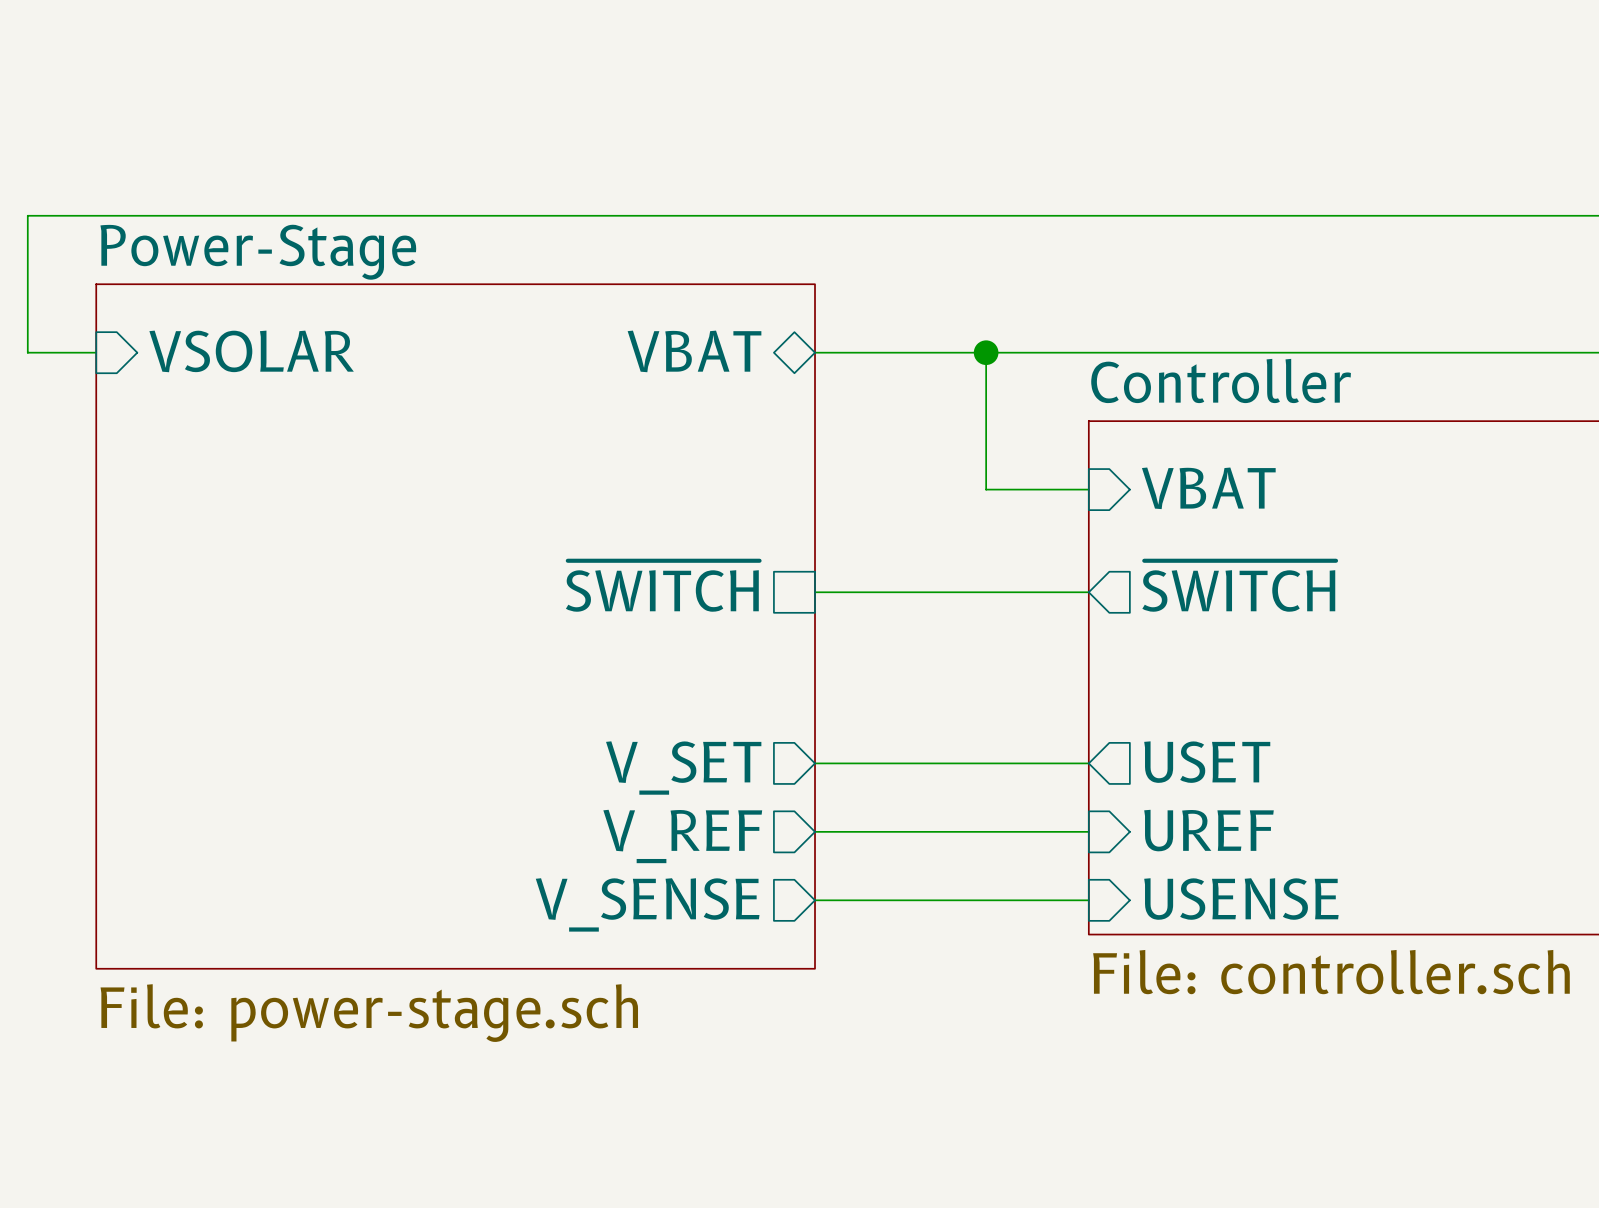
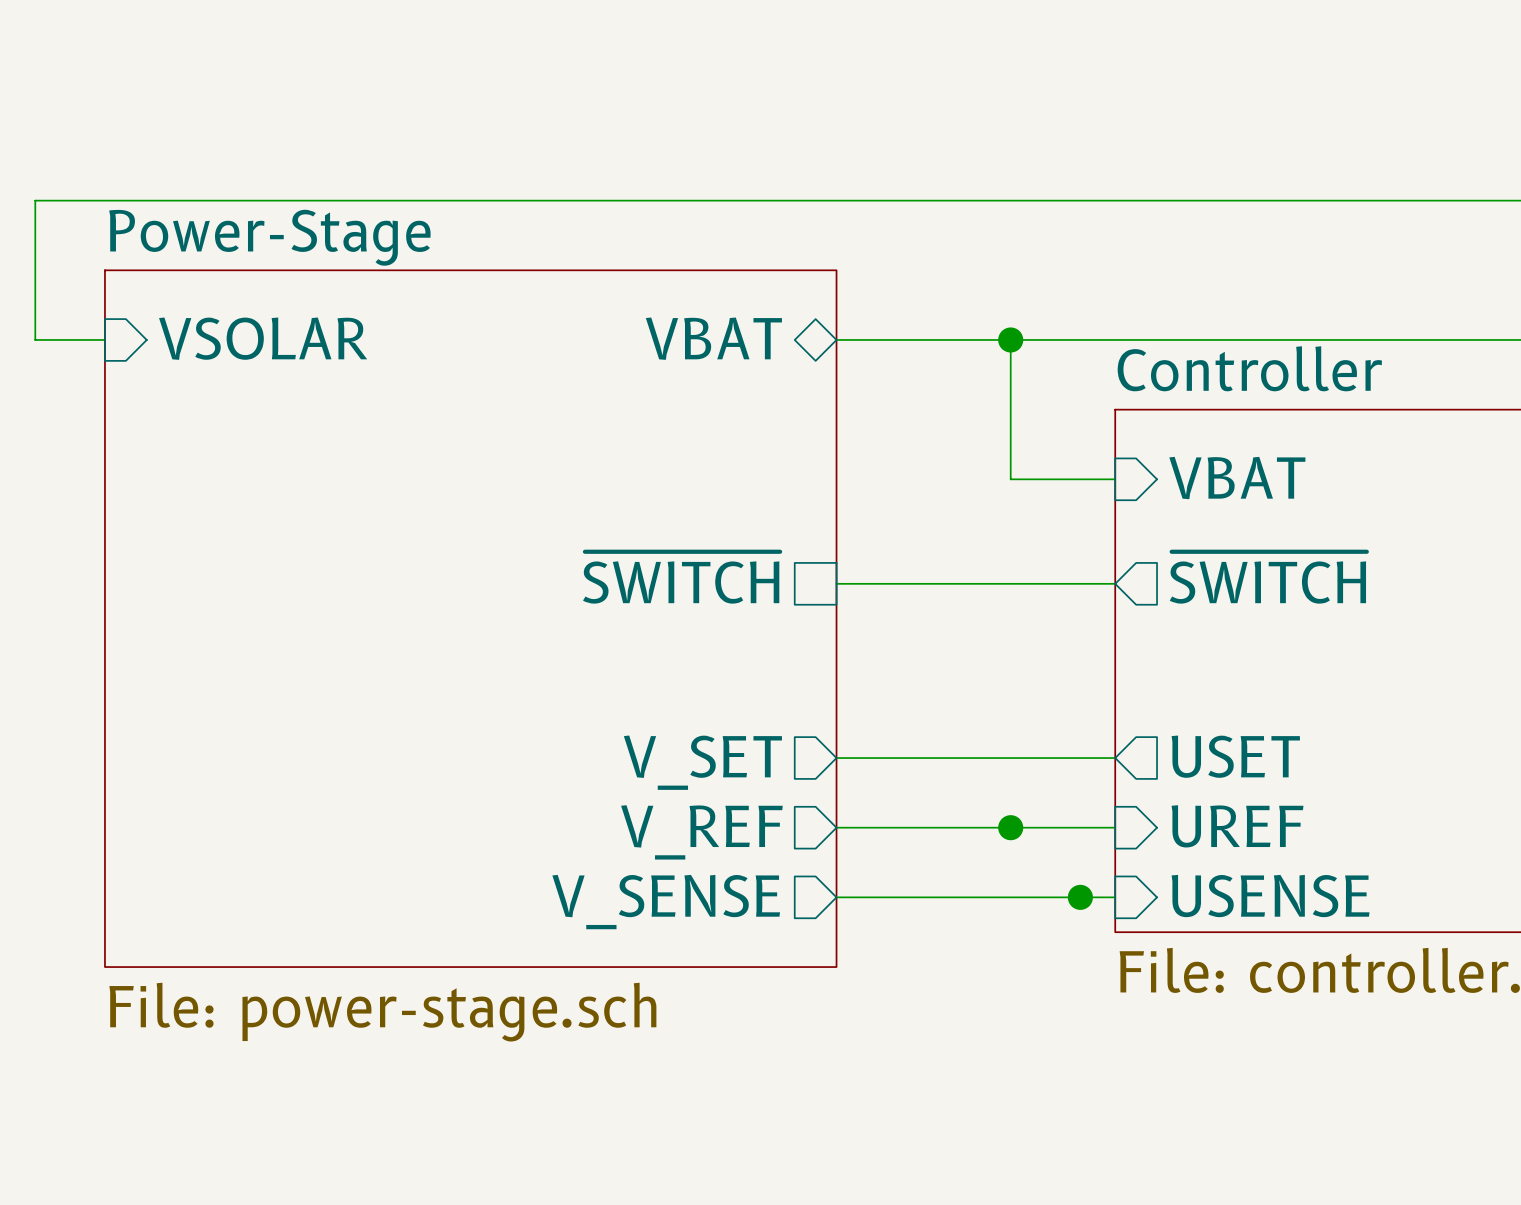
junction: none -> (1010, 827)
junction: none -> (1080, 897)

